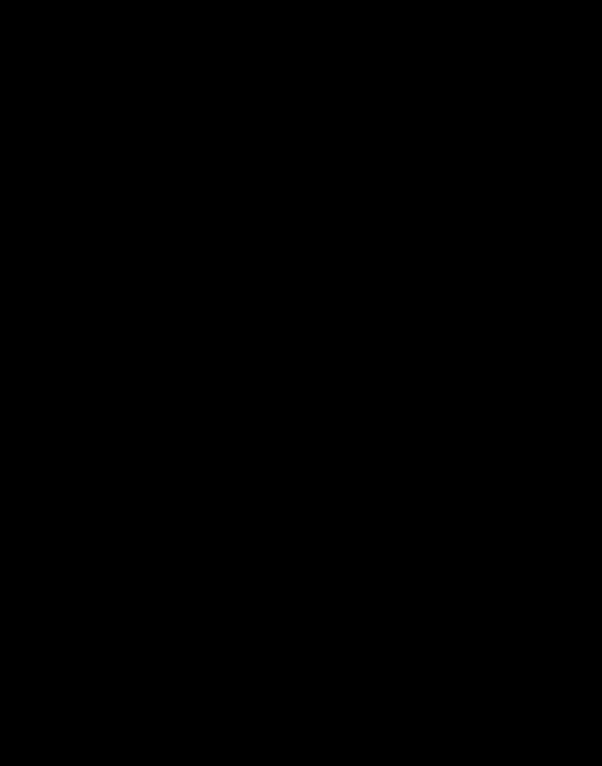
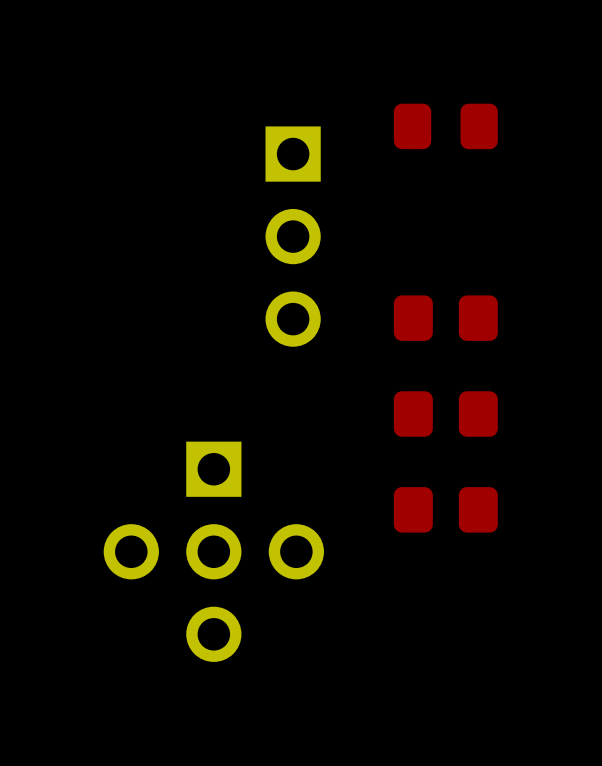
part: none -> (445, 126)
part: none -> (293, 236)
part: none -> (445, 318)
part: none -> (445, 414)
part: none -> (445, 509)
part: none -> (213, 551)

